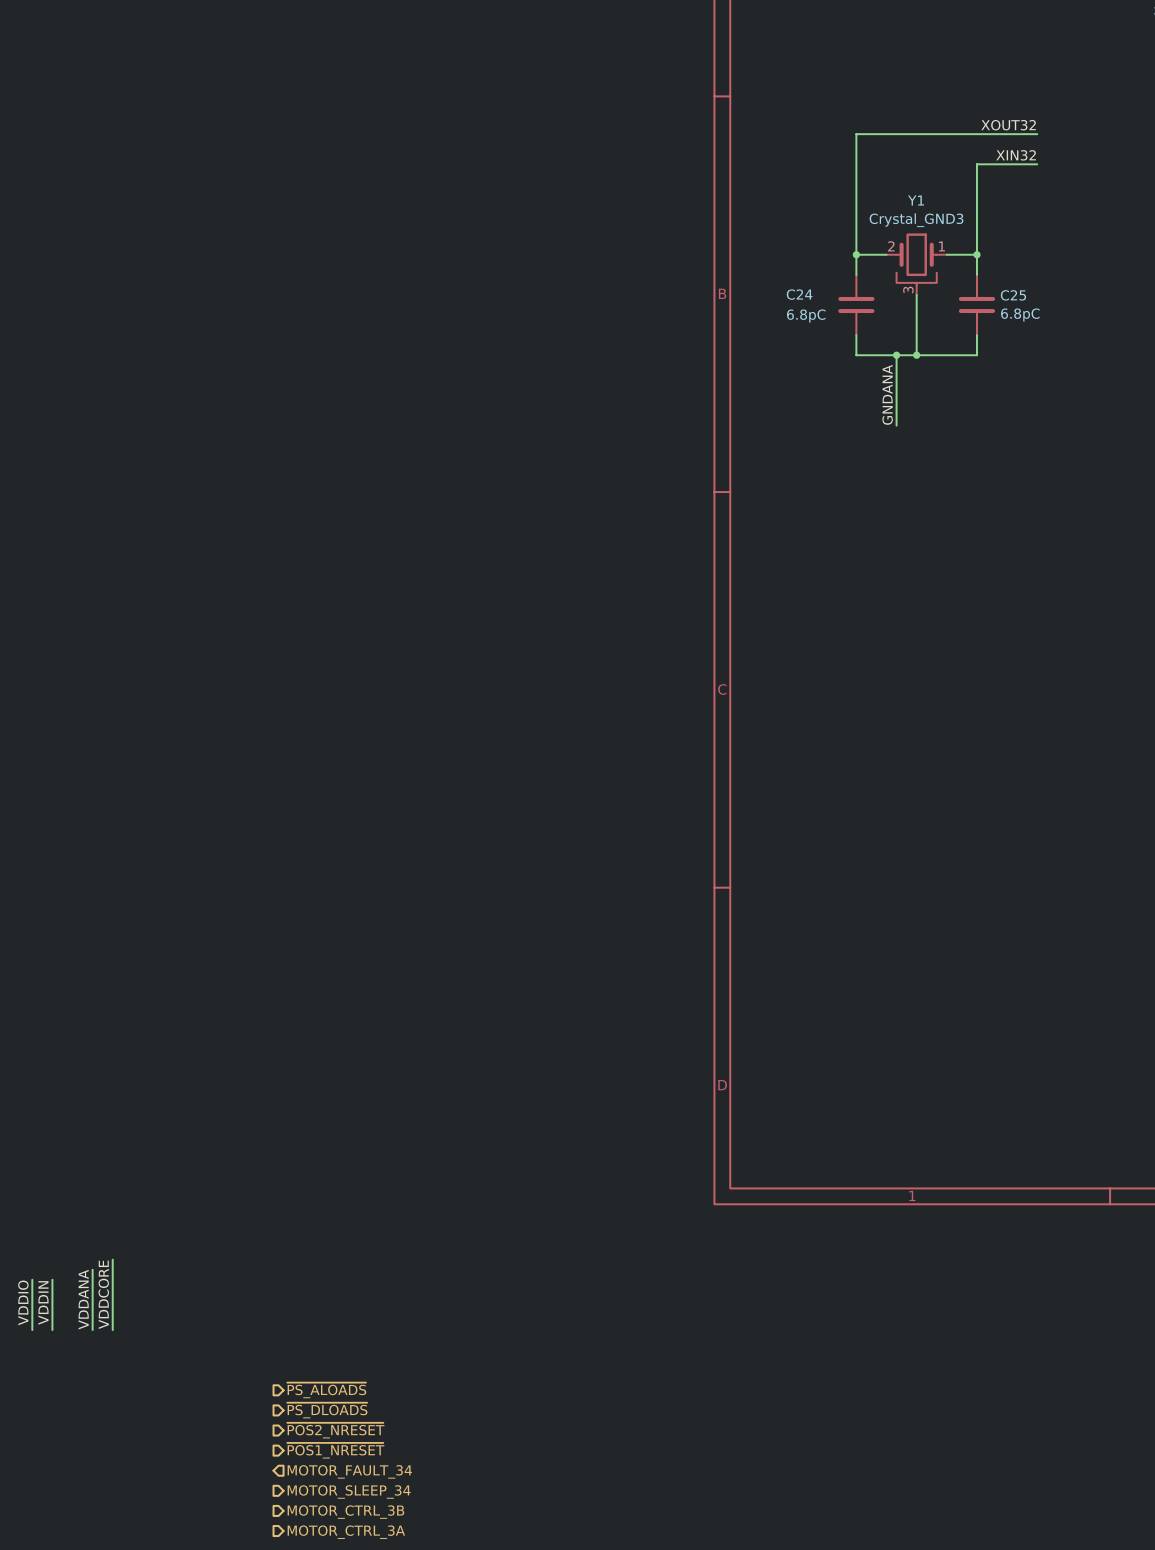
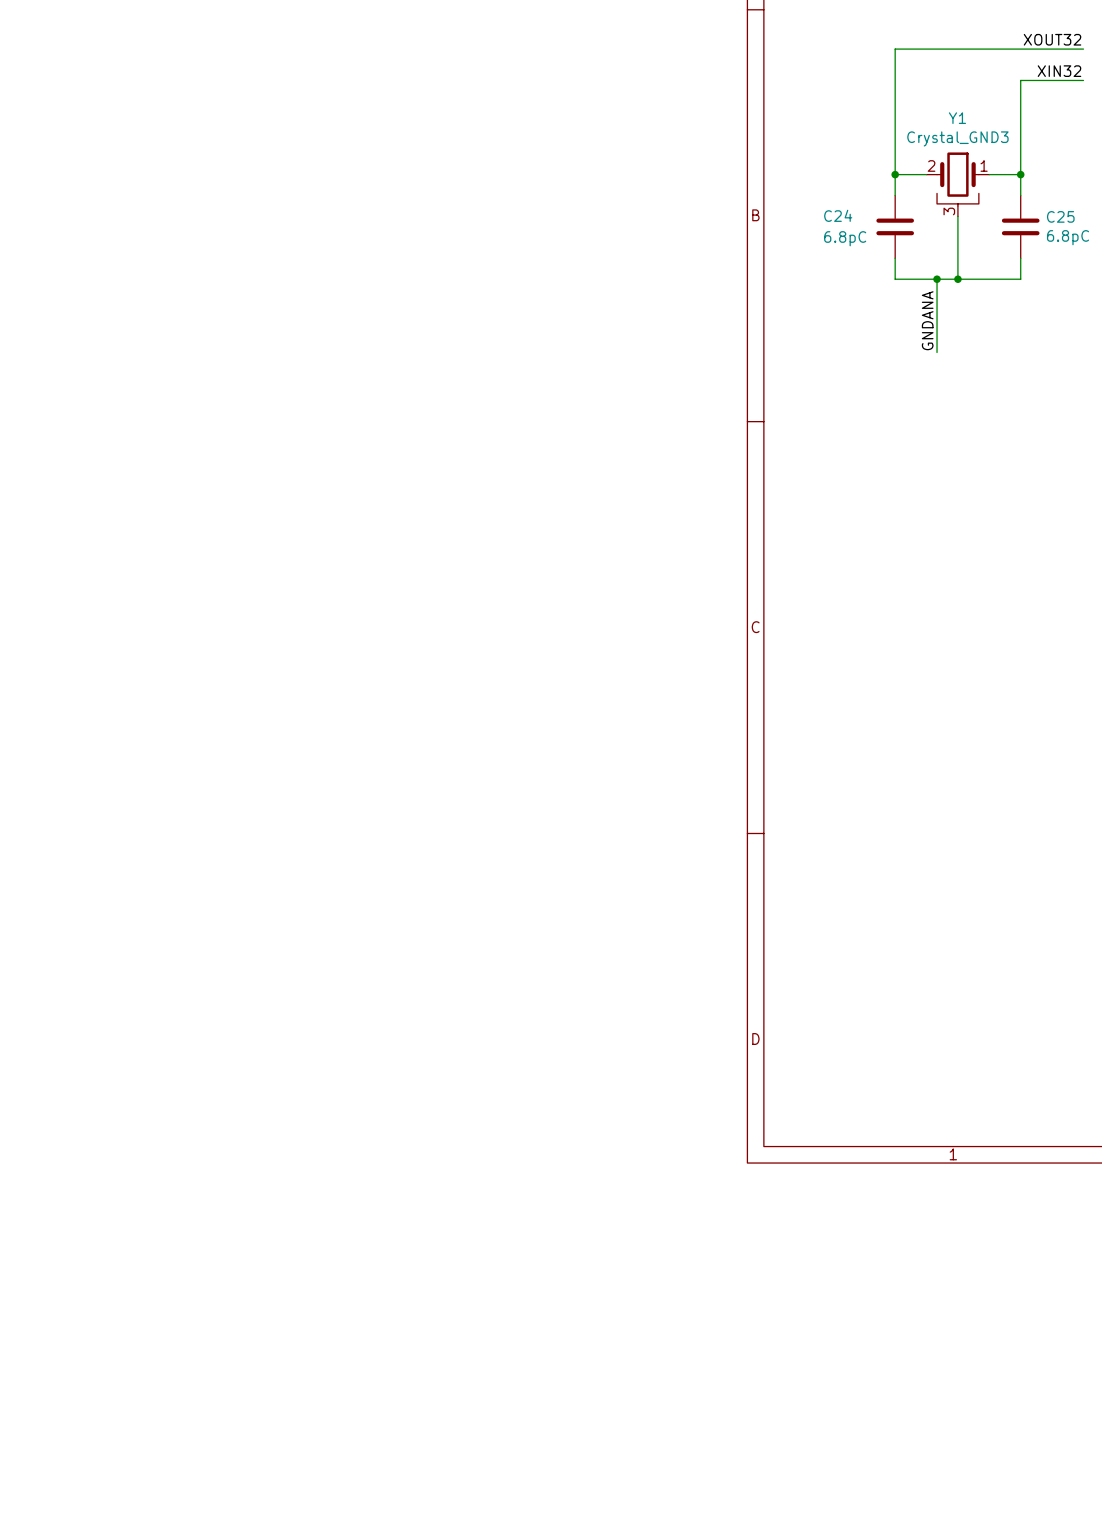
wire: (112, 1259) (112, 1330) -> none
wire: (92, 1269) (92, 1330) -> none
wire: (32, 1279) (32, 1330) -> none
wire: (52, 1279) (52, 1330) -> none
label: VDDCORE (103, 1294) -> none
label: VDDANA (83, 1299) -> none
label: VDDIO (23, 1302) -> none
label: VDDIN (43, 1302) -> none
hierarchical label: ~{PS_ALOADS} (326, 1390) -> none
hierarchical label: ~{PS_DLOADS} (327, 1410) -> none
hierarchical label: ~{POS2_NRESET} (335, 1430) -> none
hierarchical label: ~{POS1_NRESET} (335, 1450) -> none
hierarchical label: MOTOR_FAULT_34 (349, 1471) -> none
hierarchical label: MOTOR_SLEEP_34 (349, 1491) -> none
hierarchical label: MOTOR_CTRL_3B (345, 1512) -> none
hierarchical label: MOTOR_CTRL_3A (346, 1532) -> none

